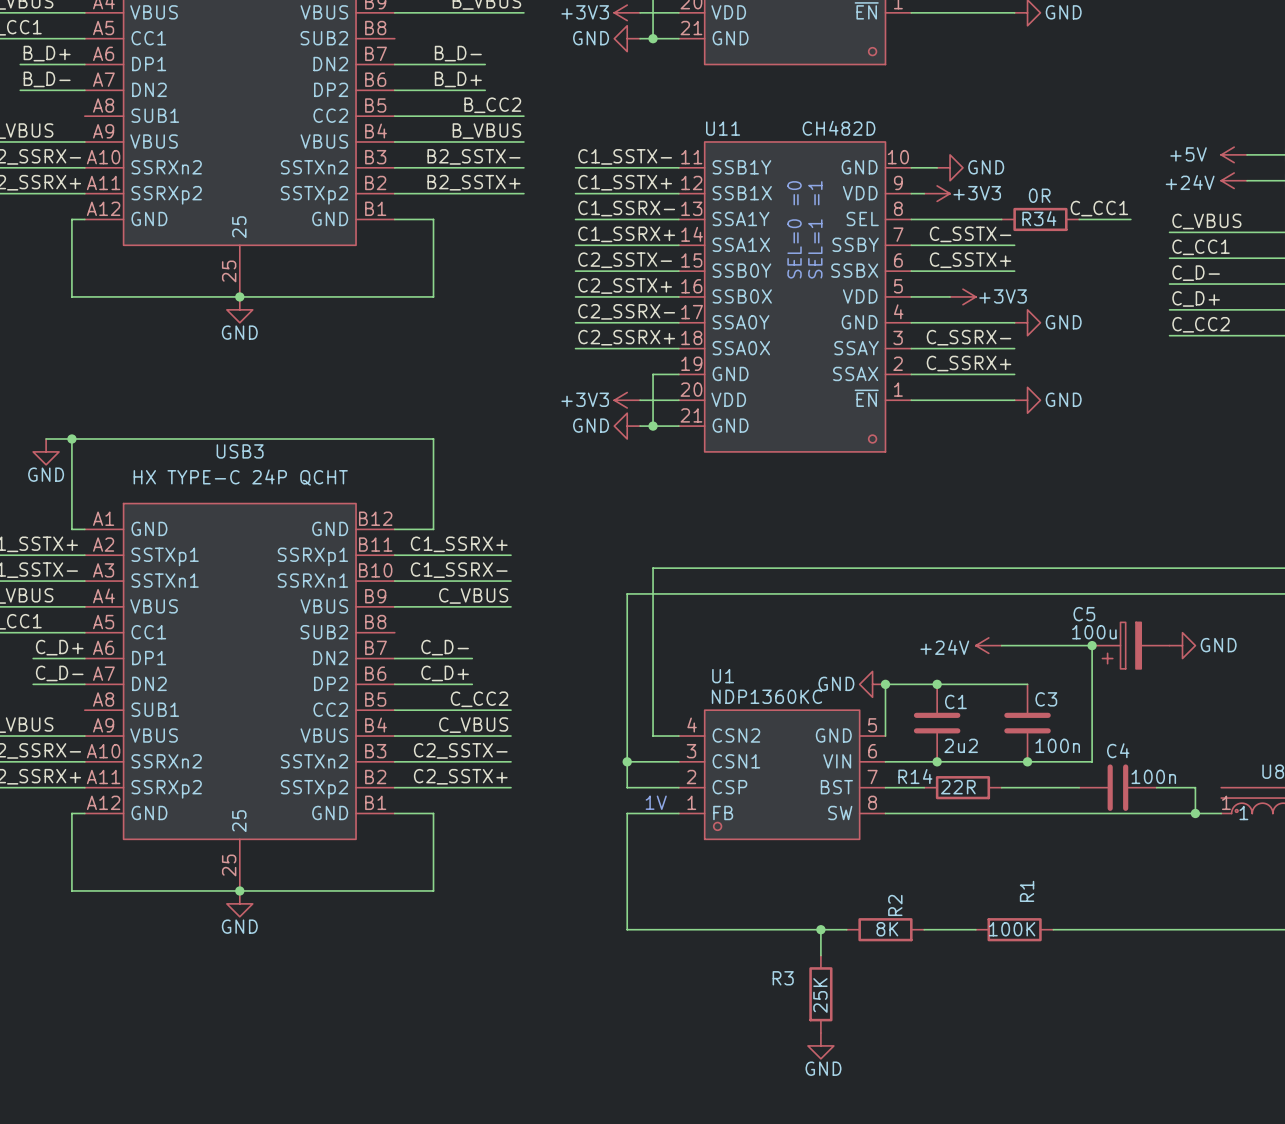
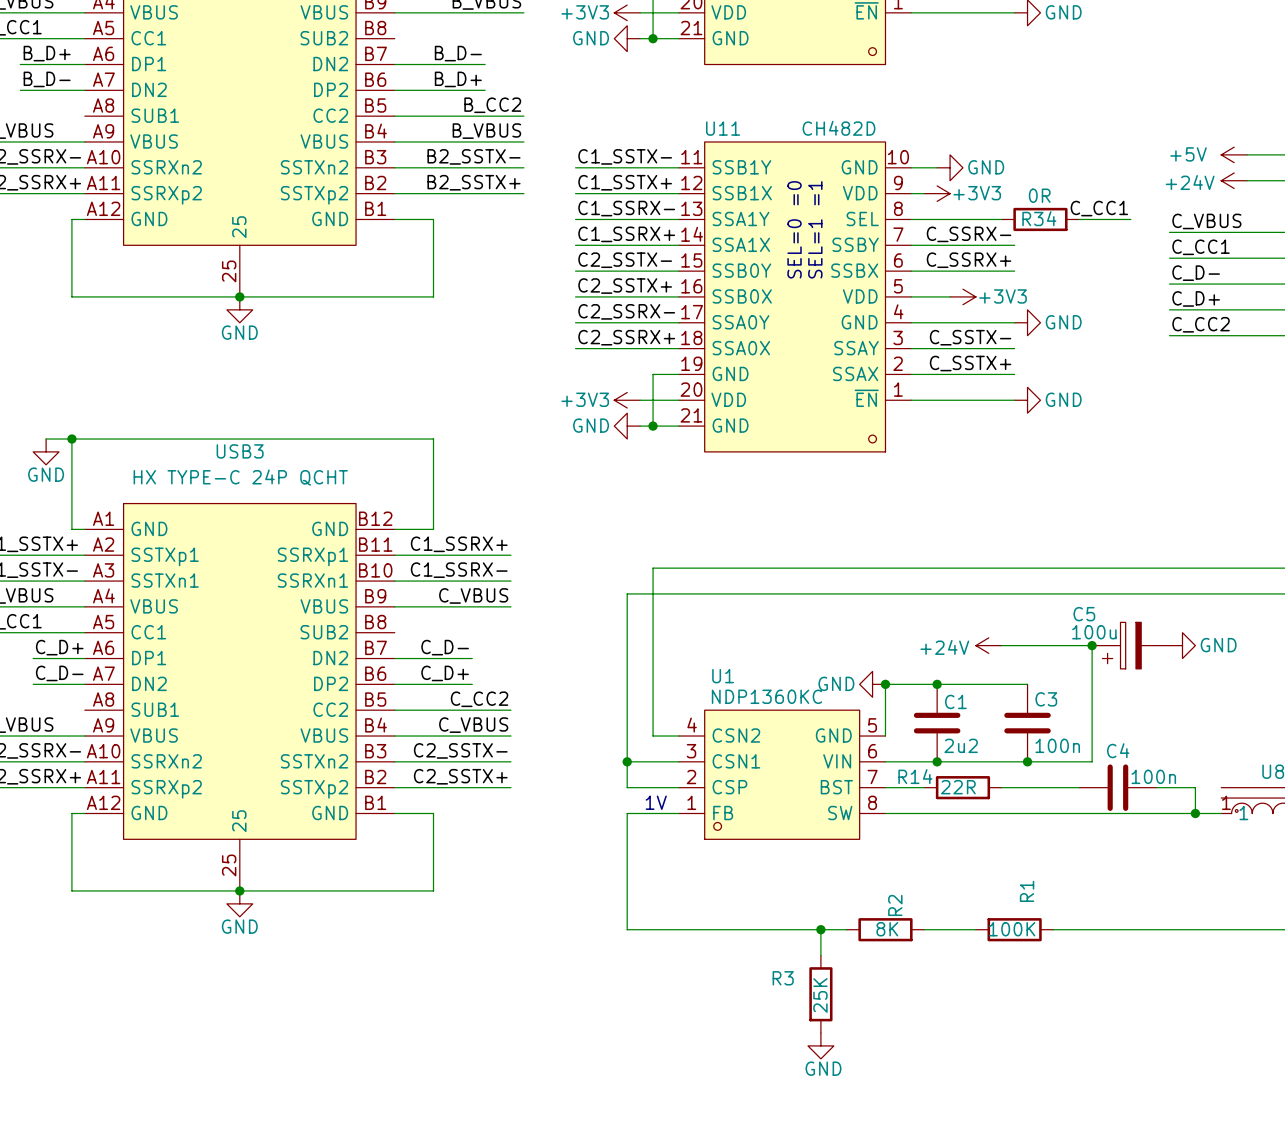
label: C_SSTX- (970, 234) -> C_SSRX- (969, 234)
label: C_SSTX+ (970, 260) -> C_SSRX+ (969, 260)
label: C_SSRX- (969, 337) -> C_SSTX- (970, 337)
label: C_SSRX+ (969, 363) -> C_SSTX+ (970, 363)

